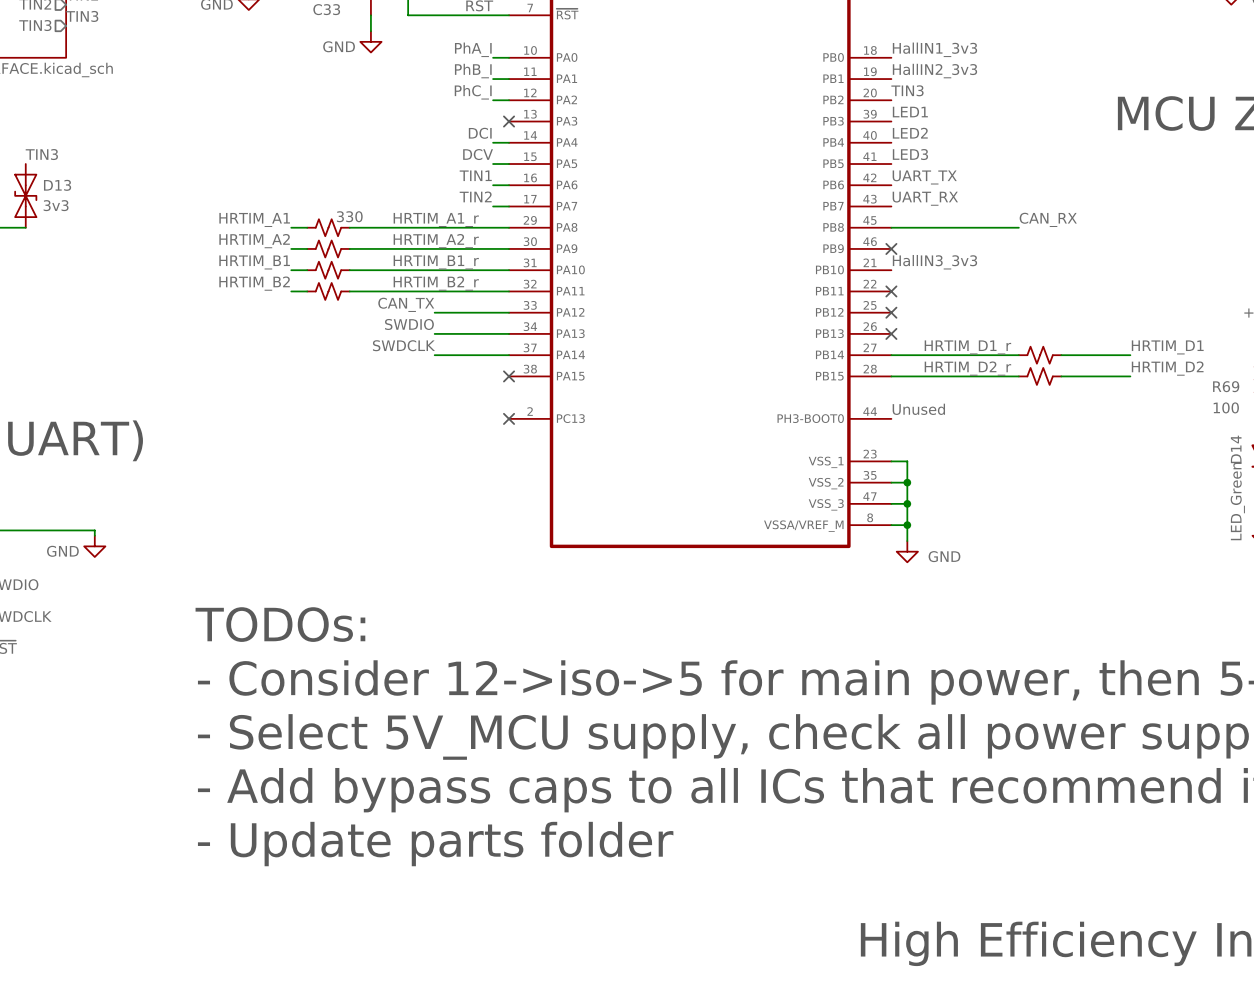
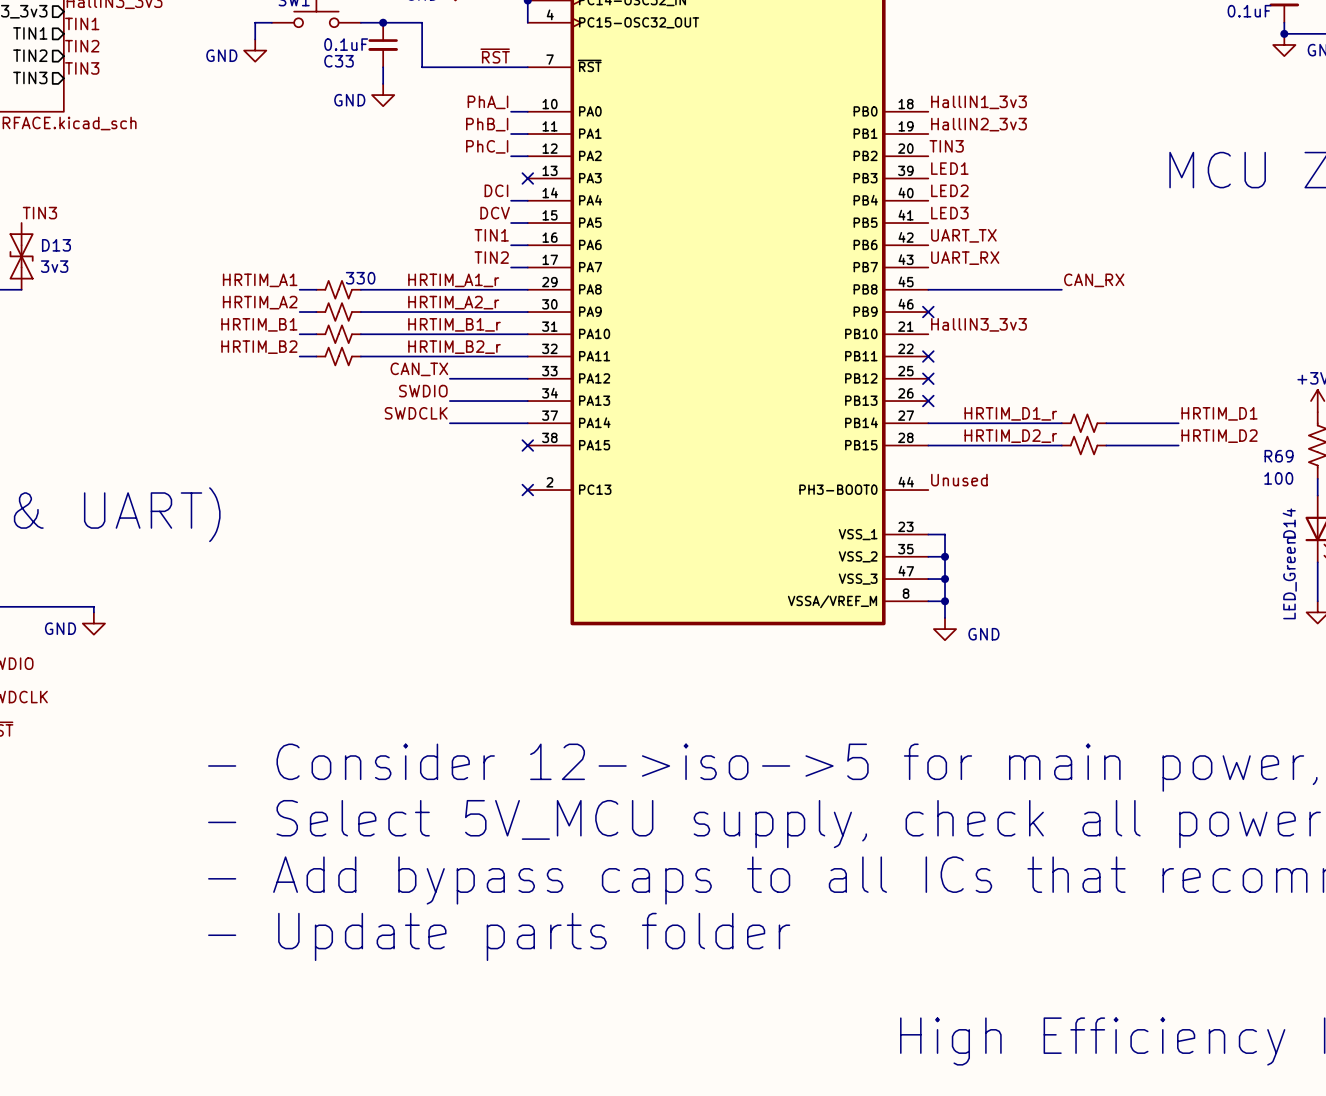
text: TODOs: (280, 624) -> none

